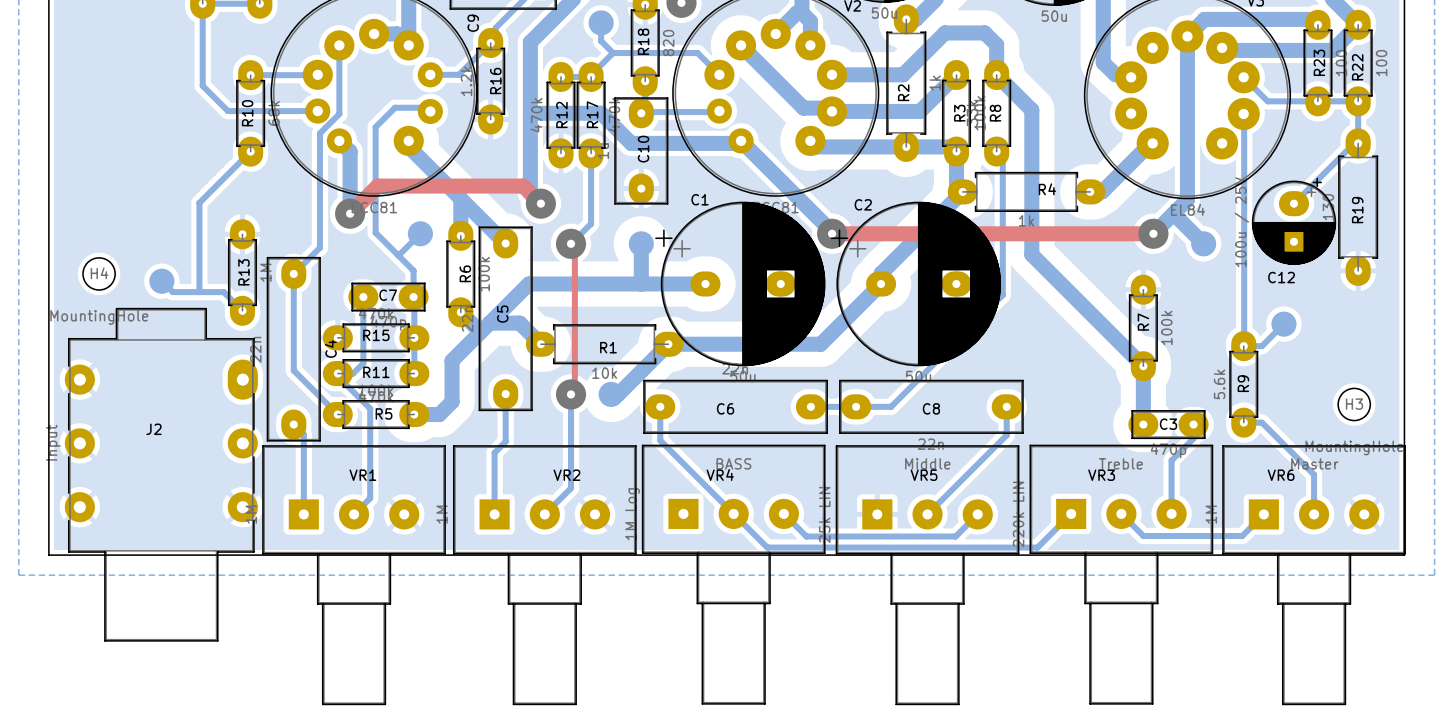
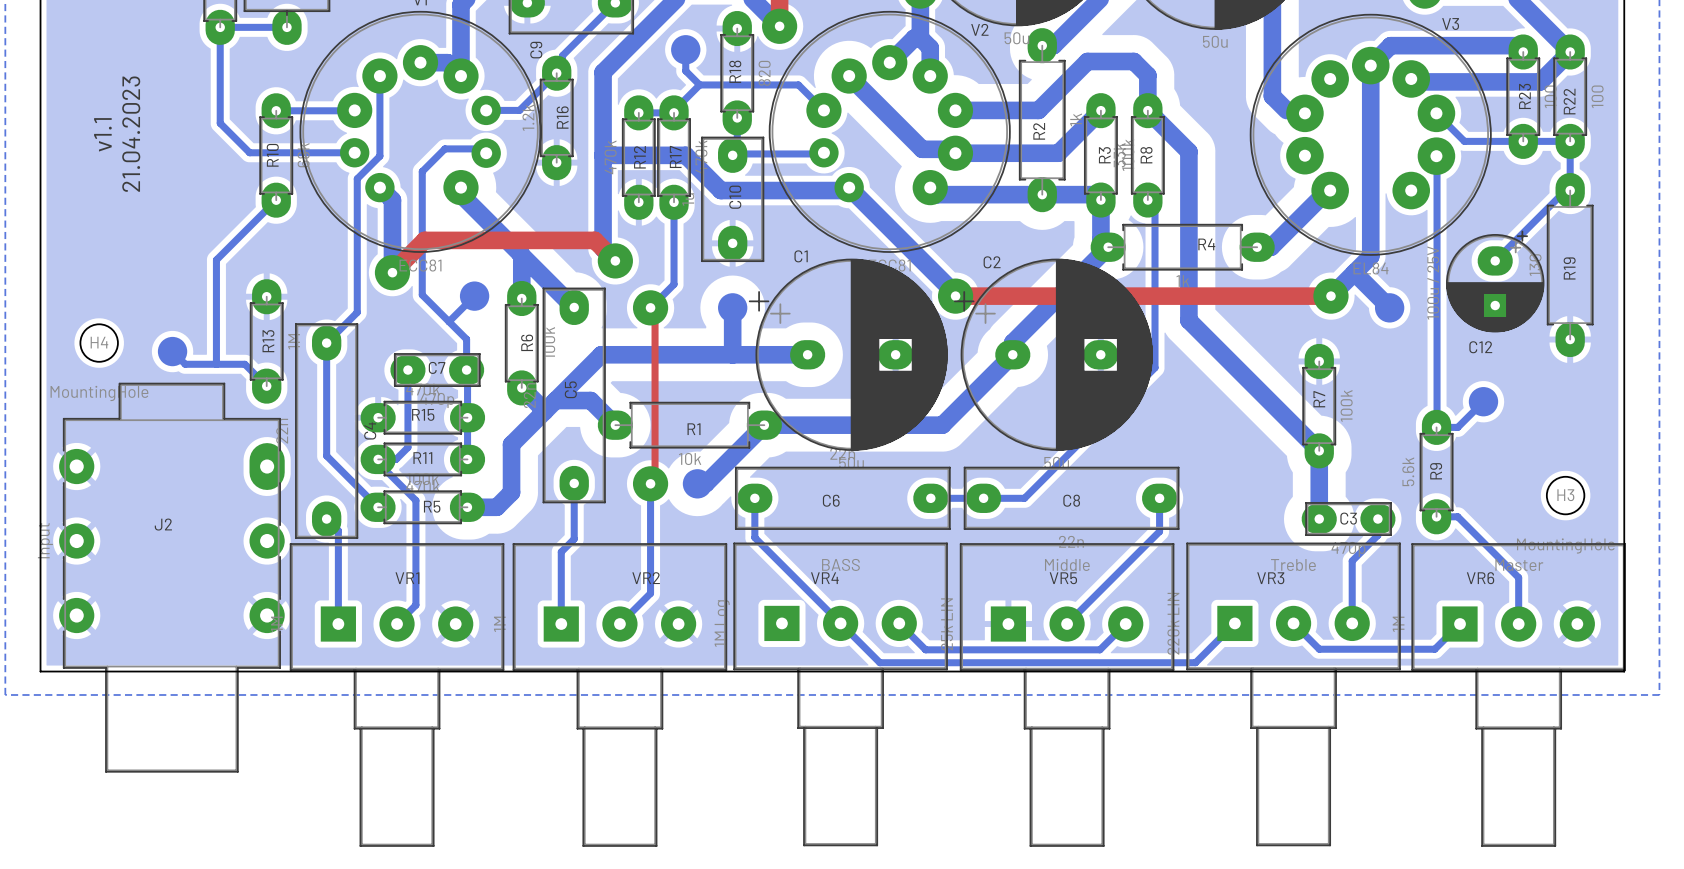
text: none -> v1.1 (102, 134)
text: none -> 21.04.2023 (131, 134)

